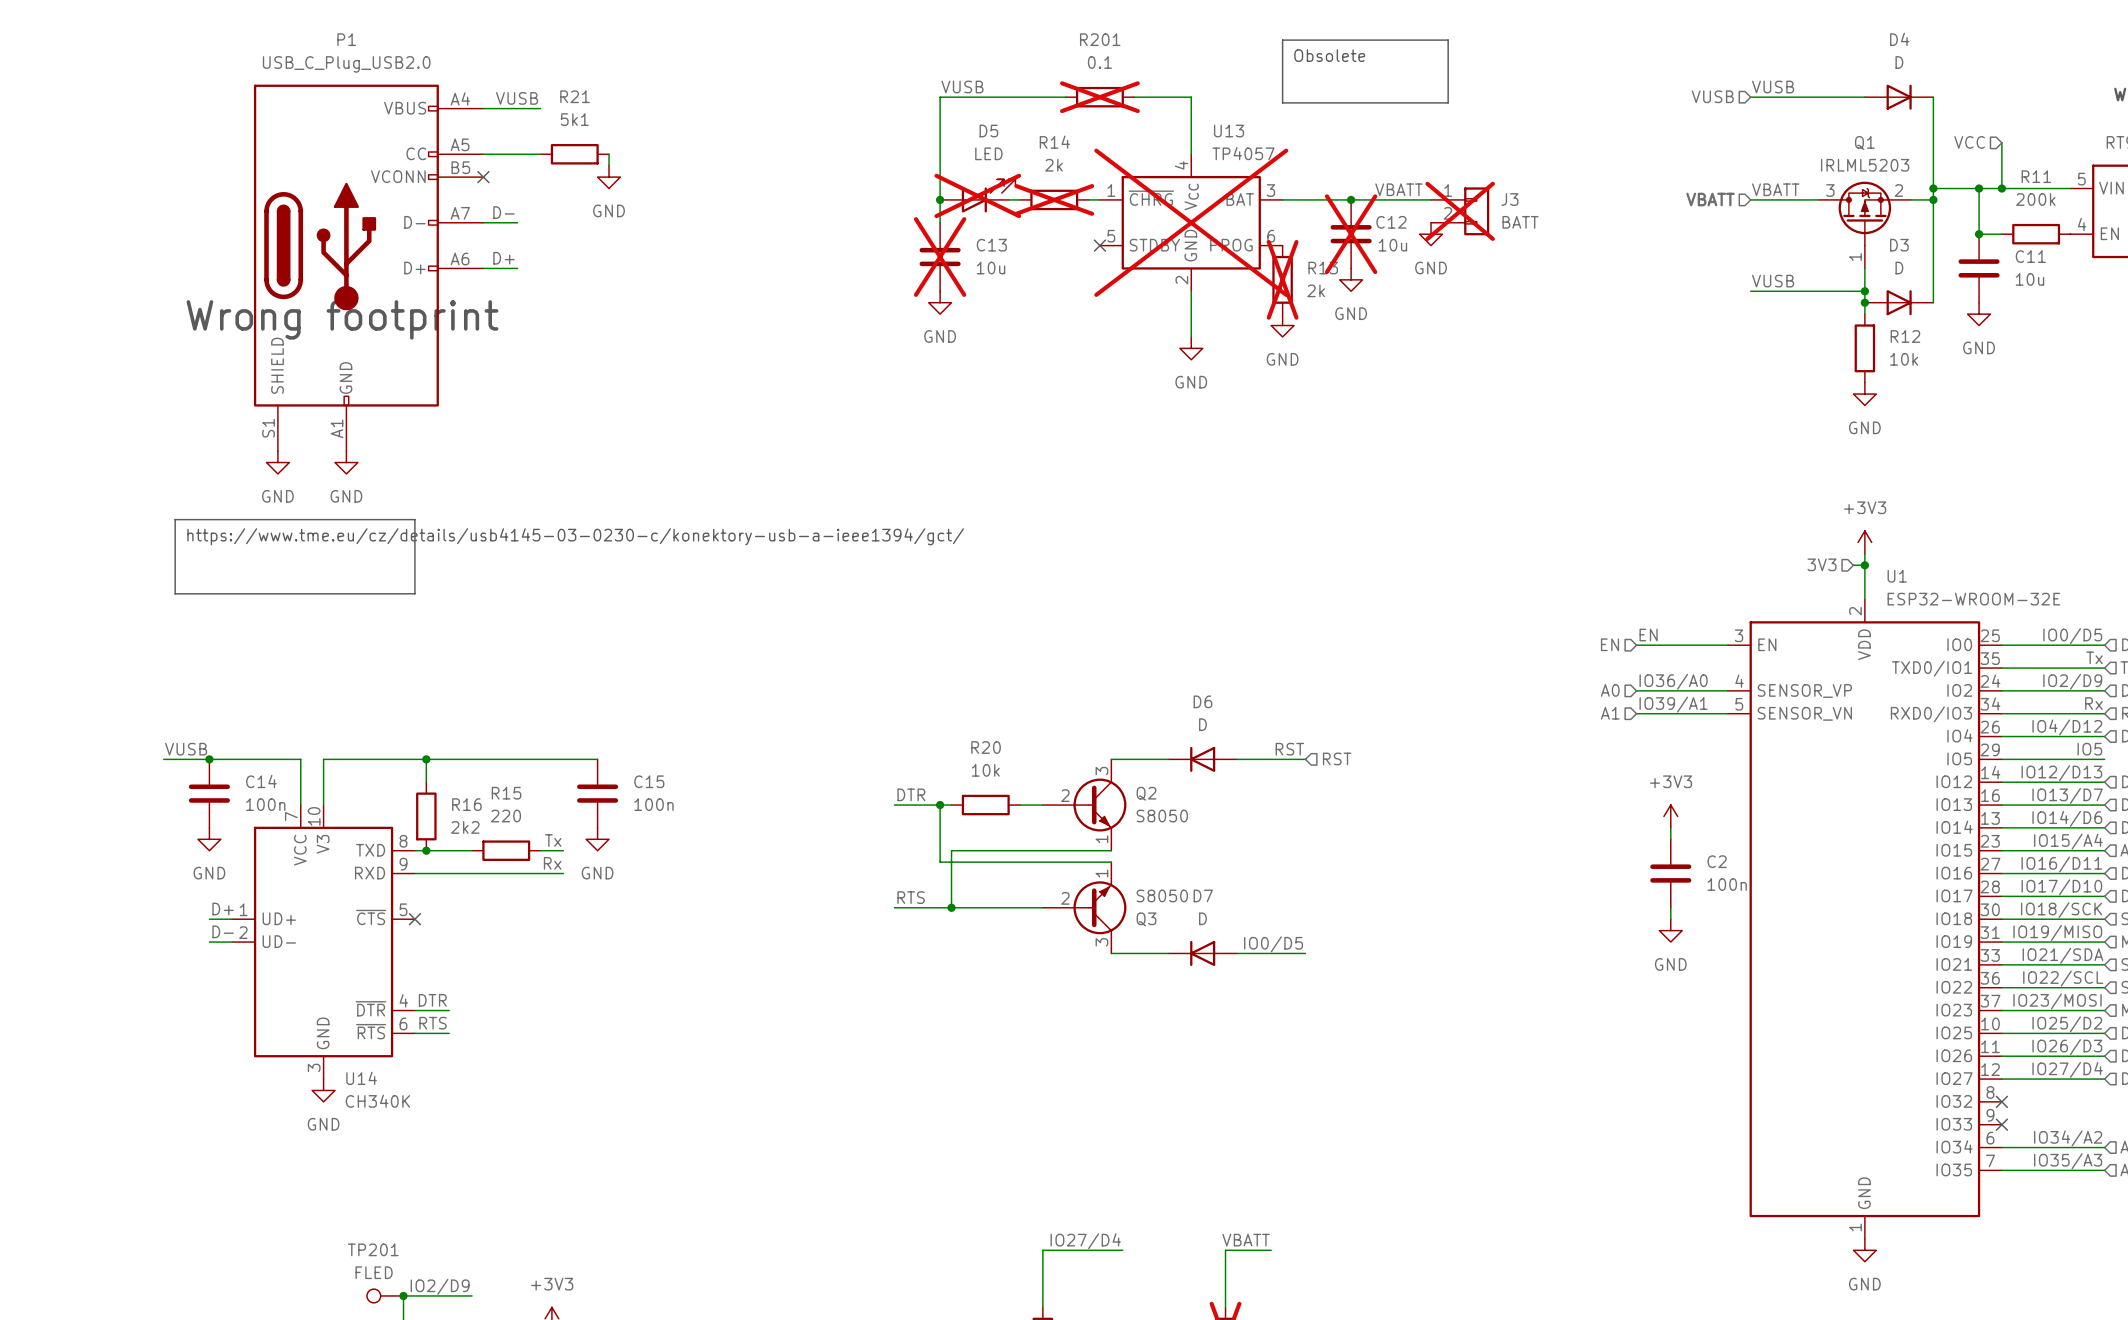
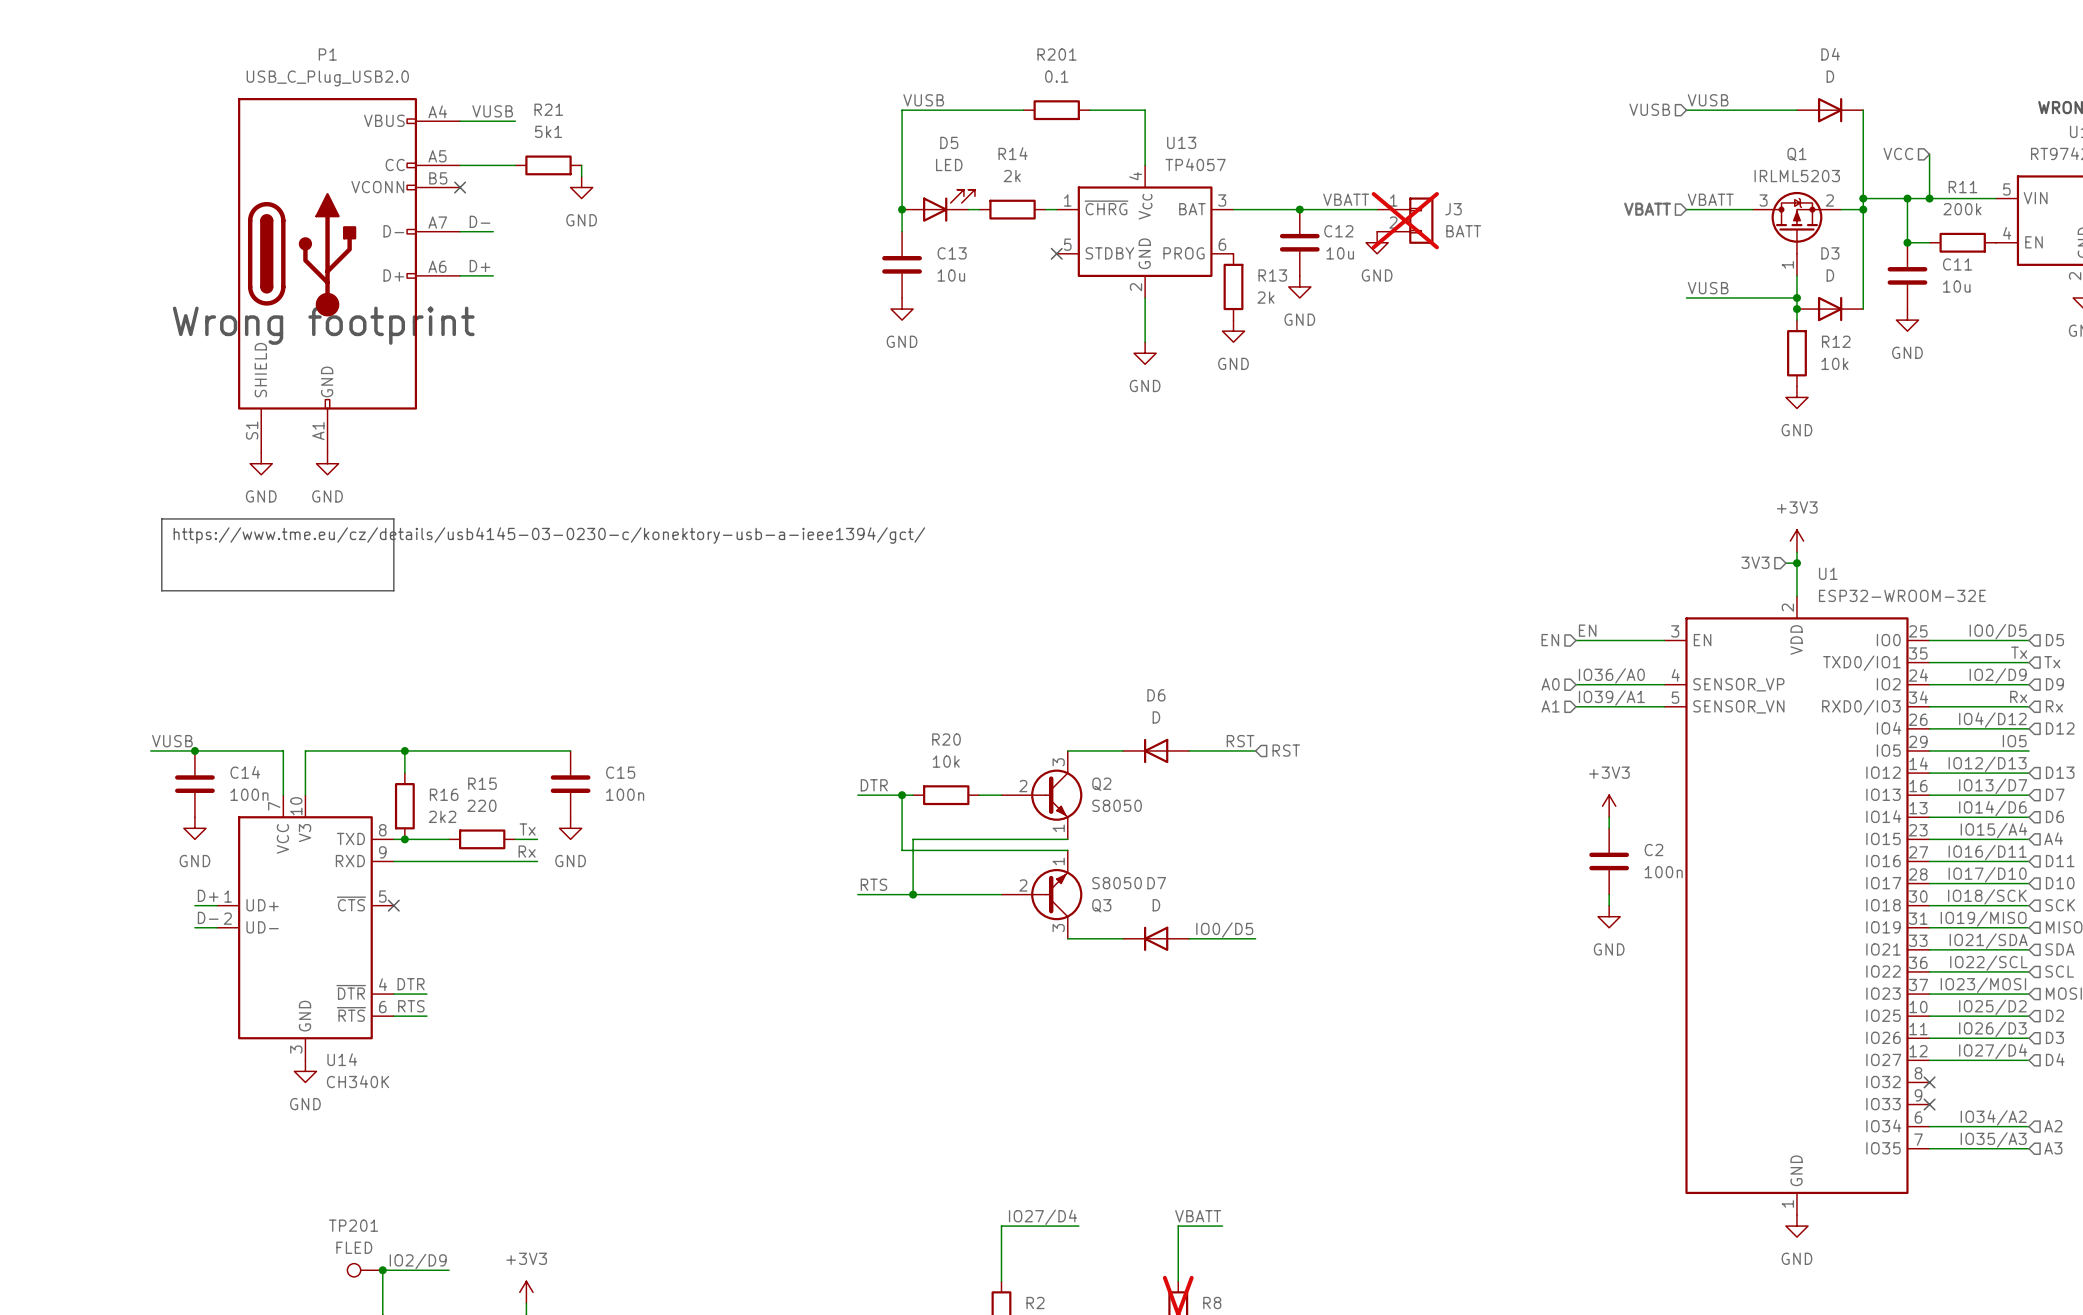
line: (1282, 40) (1448, 40) (1448, 102) (1282, 102) (1282, 40) -> none
text: Obsolete (1329, 55) -> none
R201 do-not-place cross: (1099, 97) -> none
D5 do-not-place cross: (977, 195) -> none
R14 do-not-place cross: (1054, 199) -> none
U13 do-not-place cross: (1191, 222) -> none
C12 do-not-place cross: (1351, 234) -> none
C13 do-not-place cross: (940, 257) -> none
R13 do-not-place cross: (1282, 279) -> none

